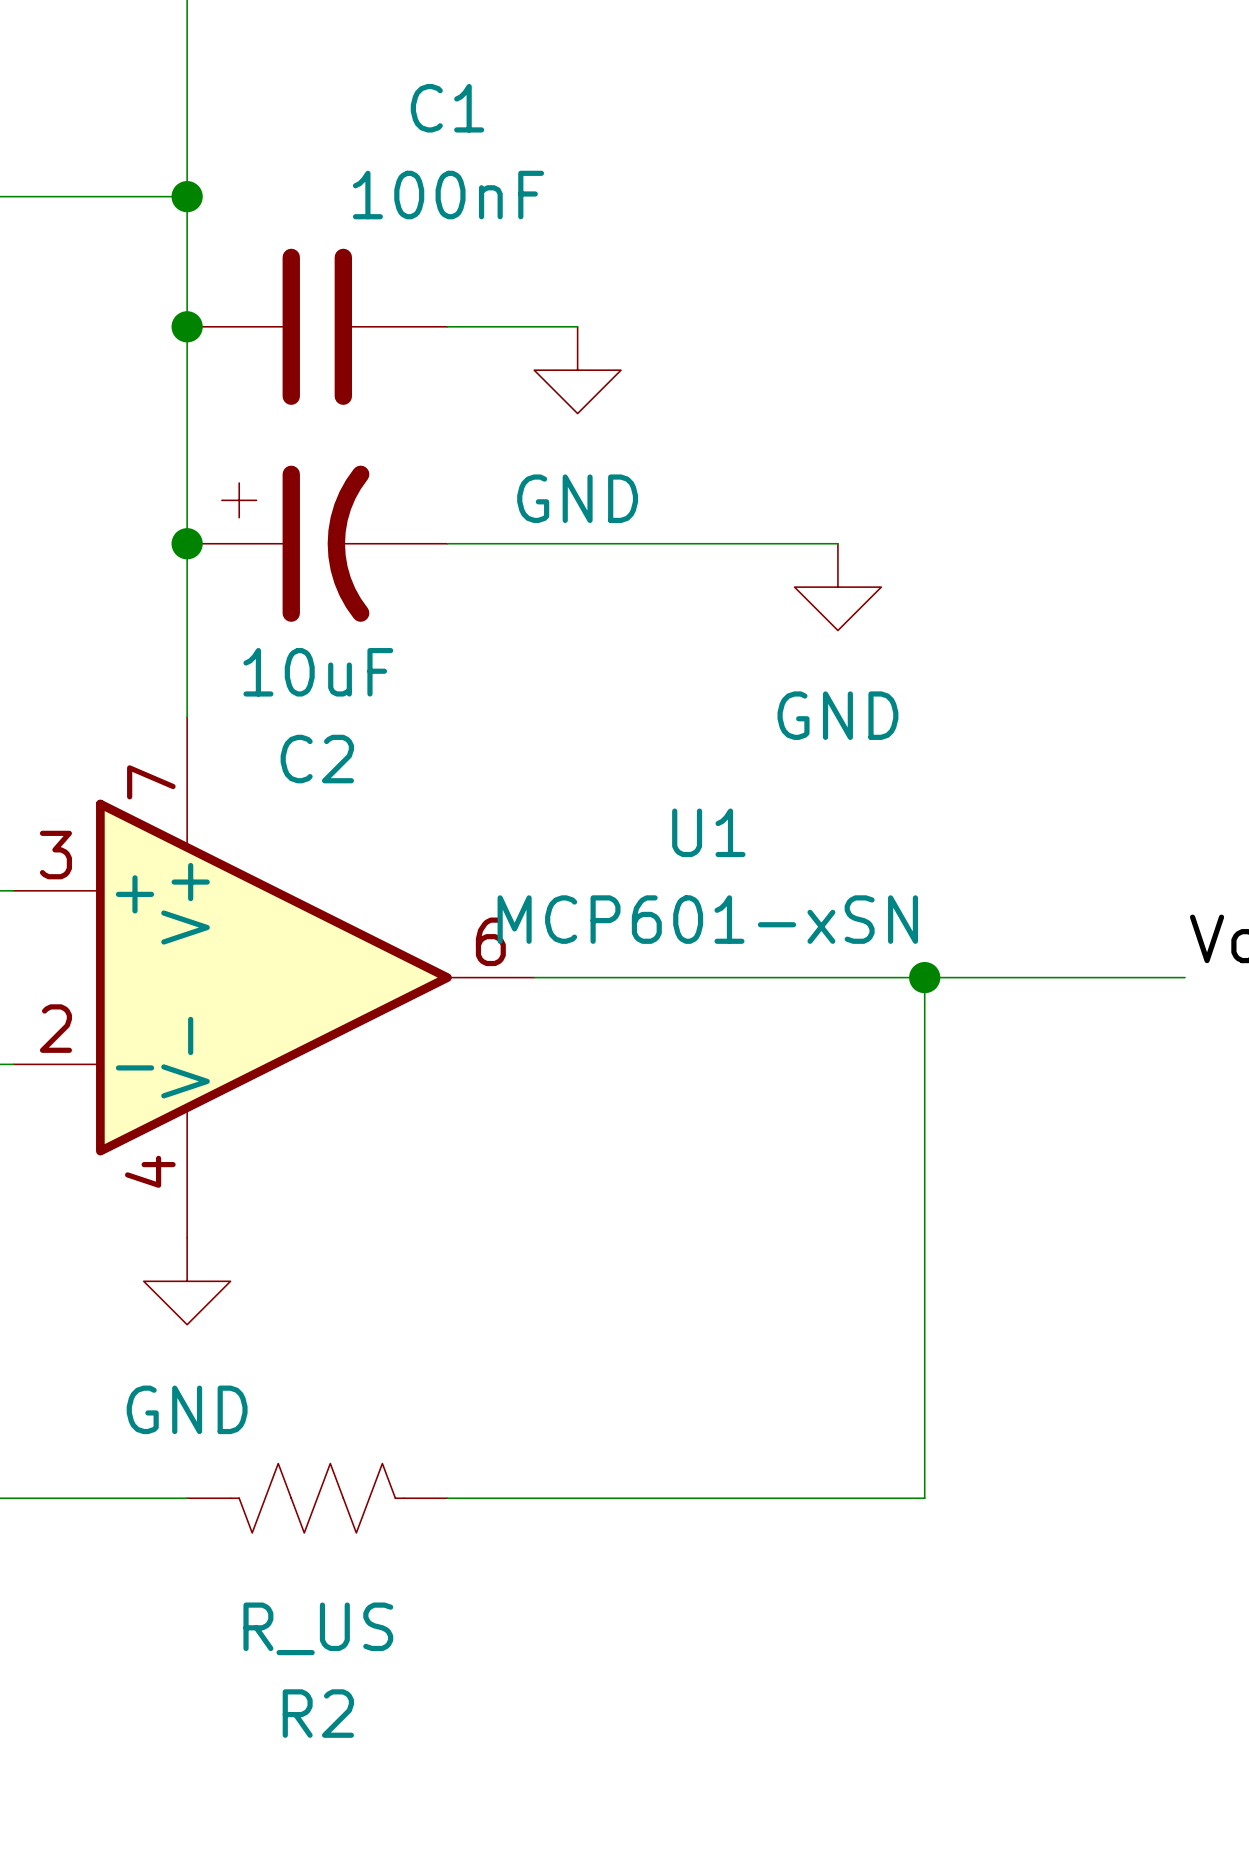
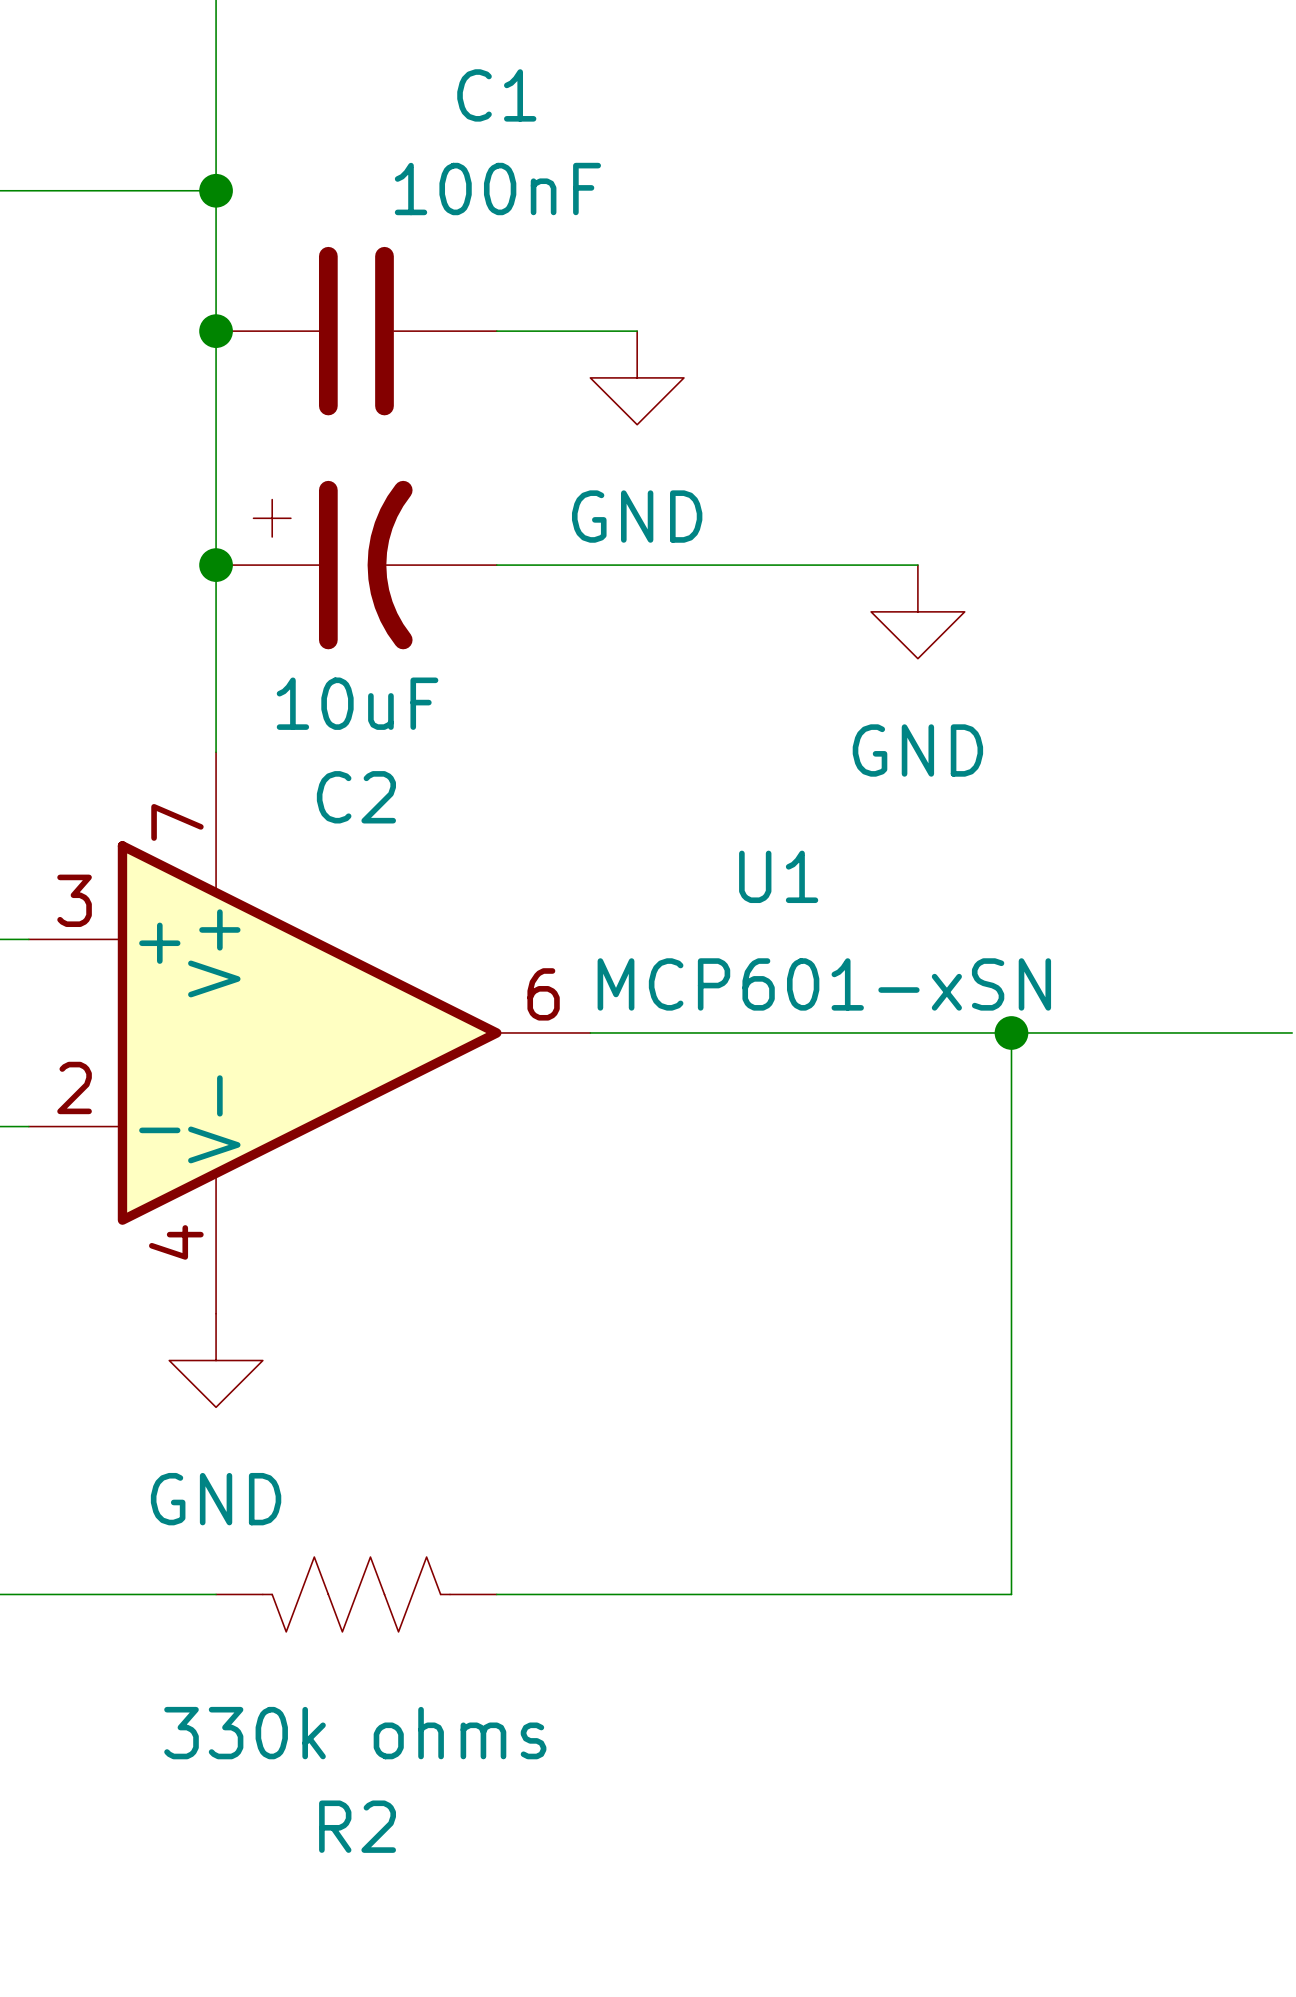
U1 value position: MCP601-xSN (707, 919) -> MCP601-xSN (824, 984)
R2 value: R_US (318, 1628) -> 330k ohms (355, 1733)

